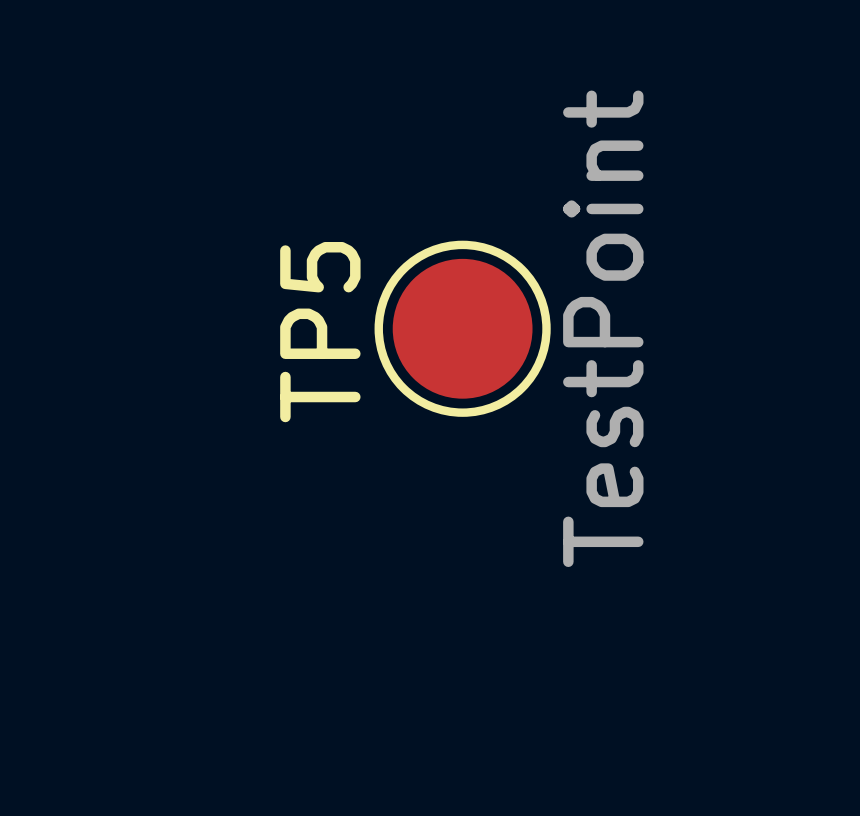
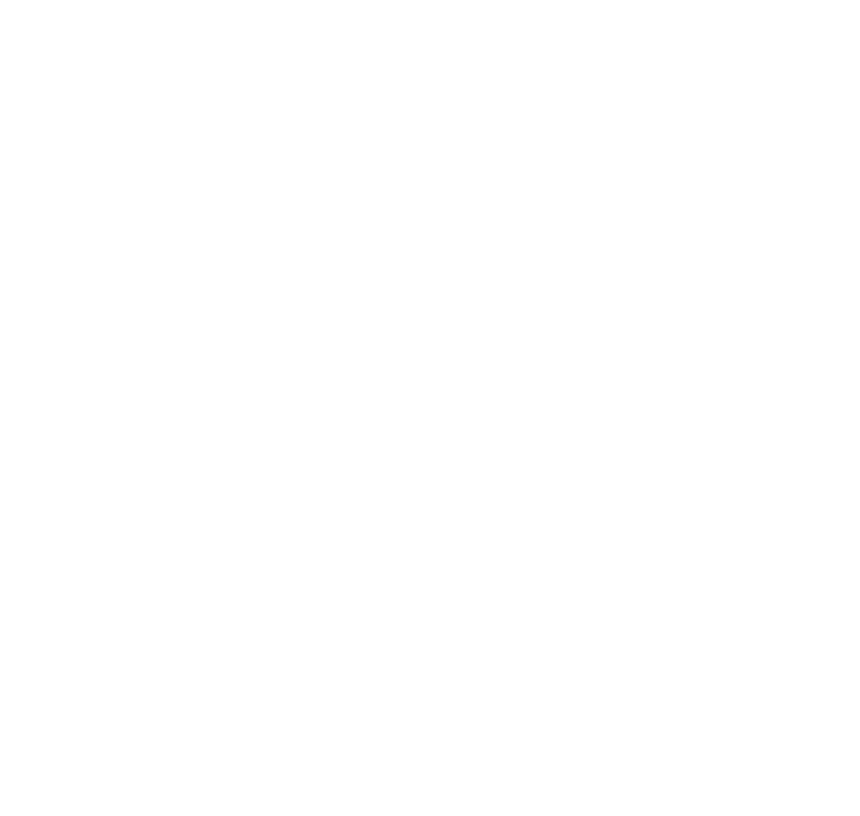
TP5: TestPoint (462, 328) -> none

